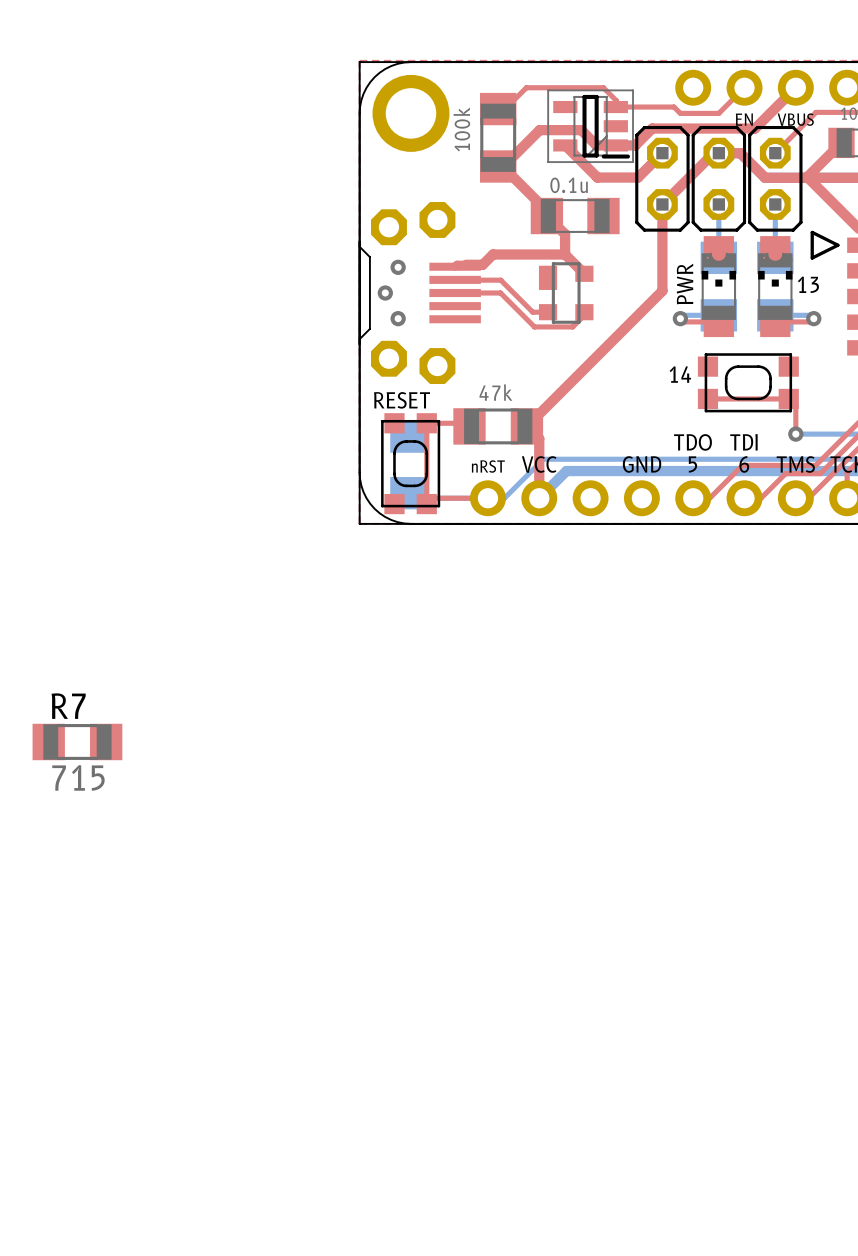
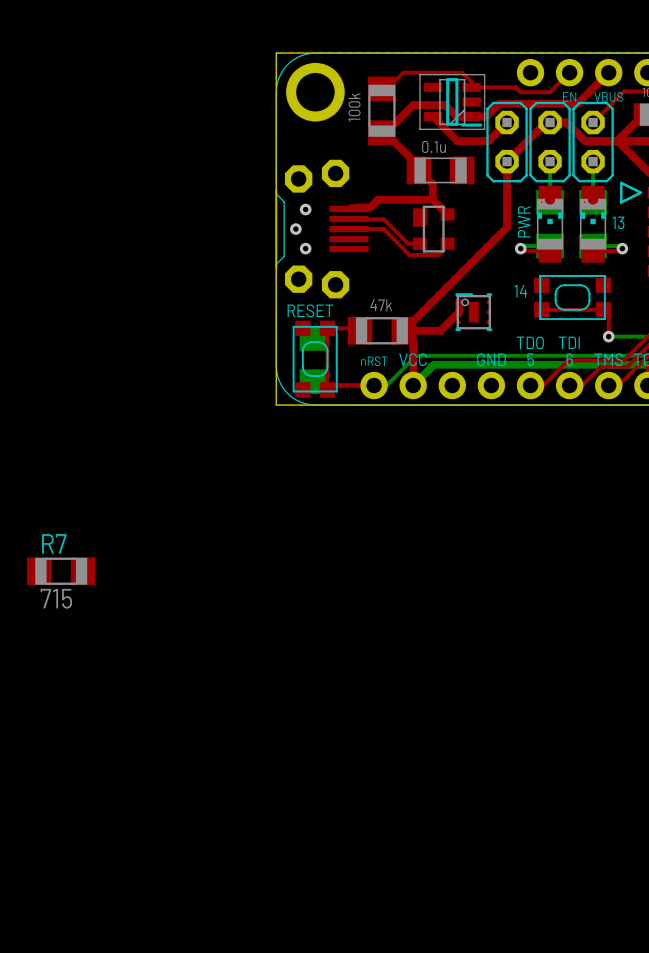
top track: none -> (459, 302) (459, 312) (440, 330) (403, 330)
part: none -> (473, 312)

